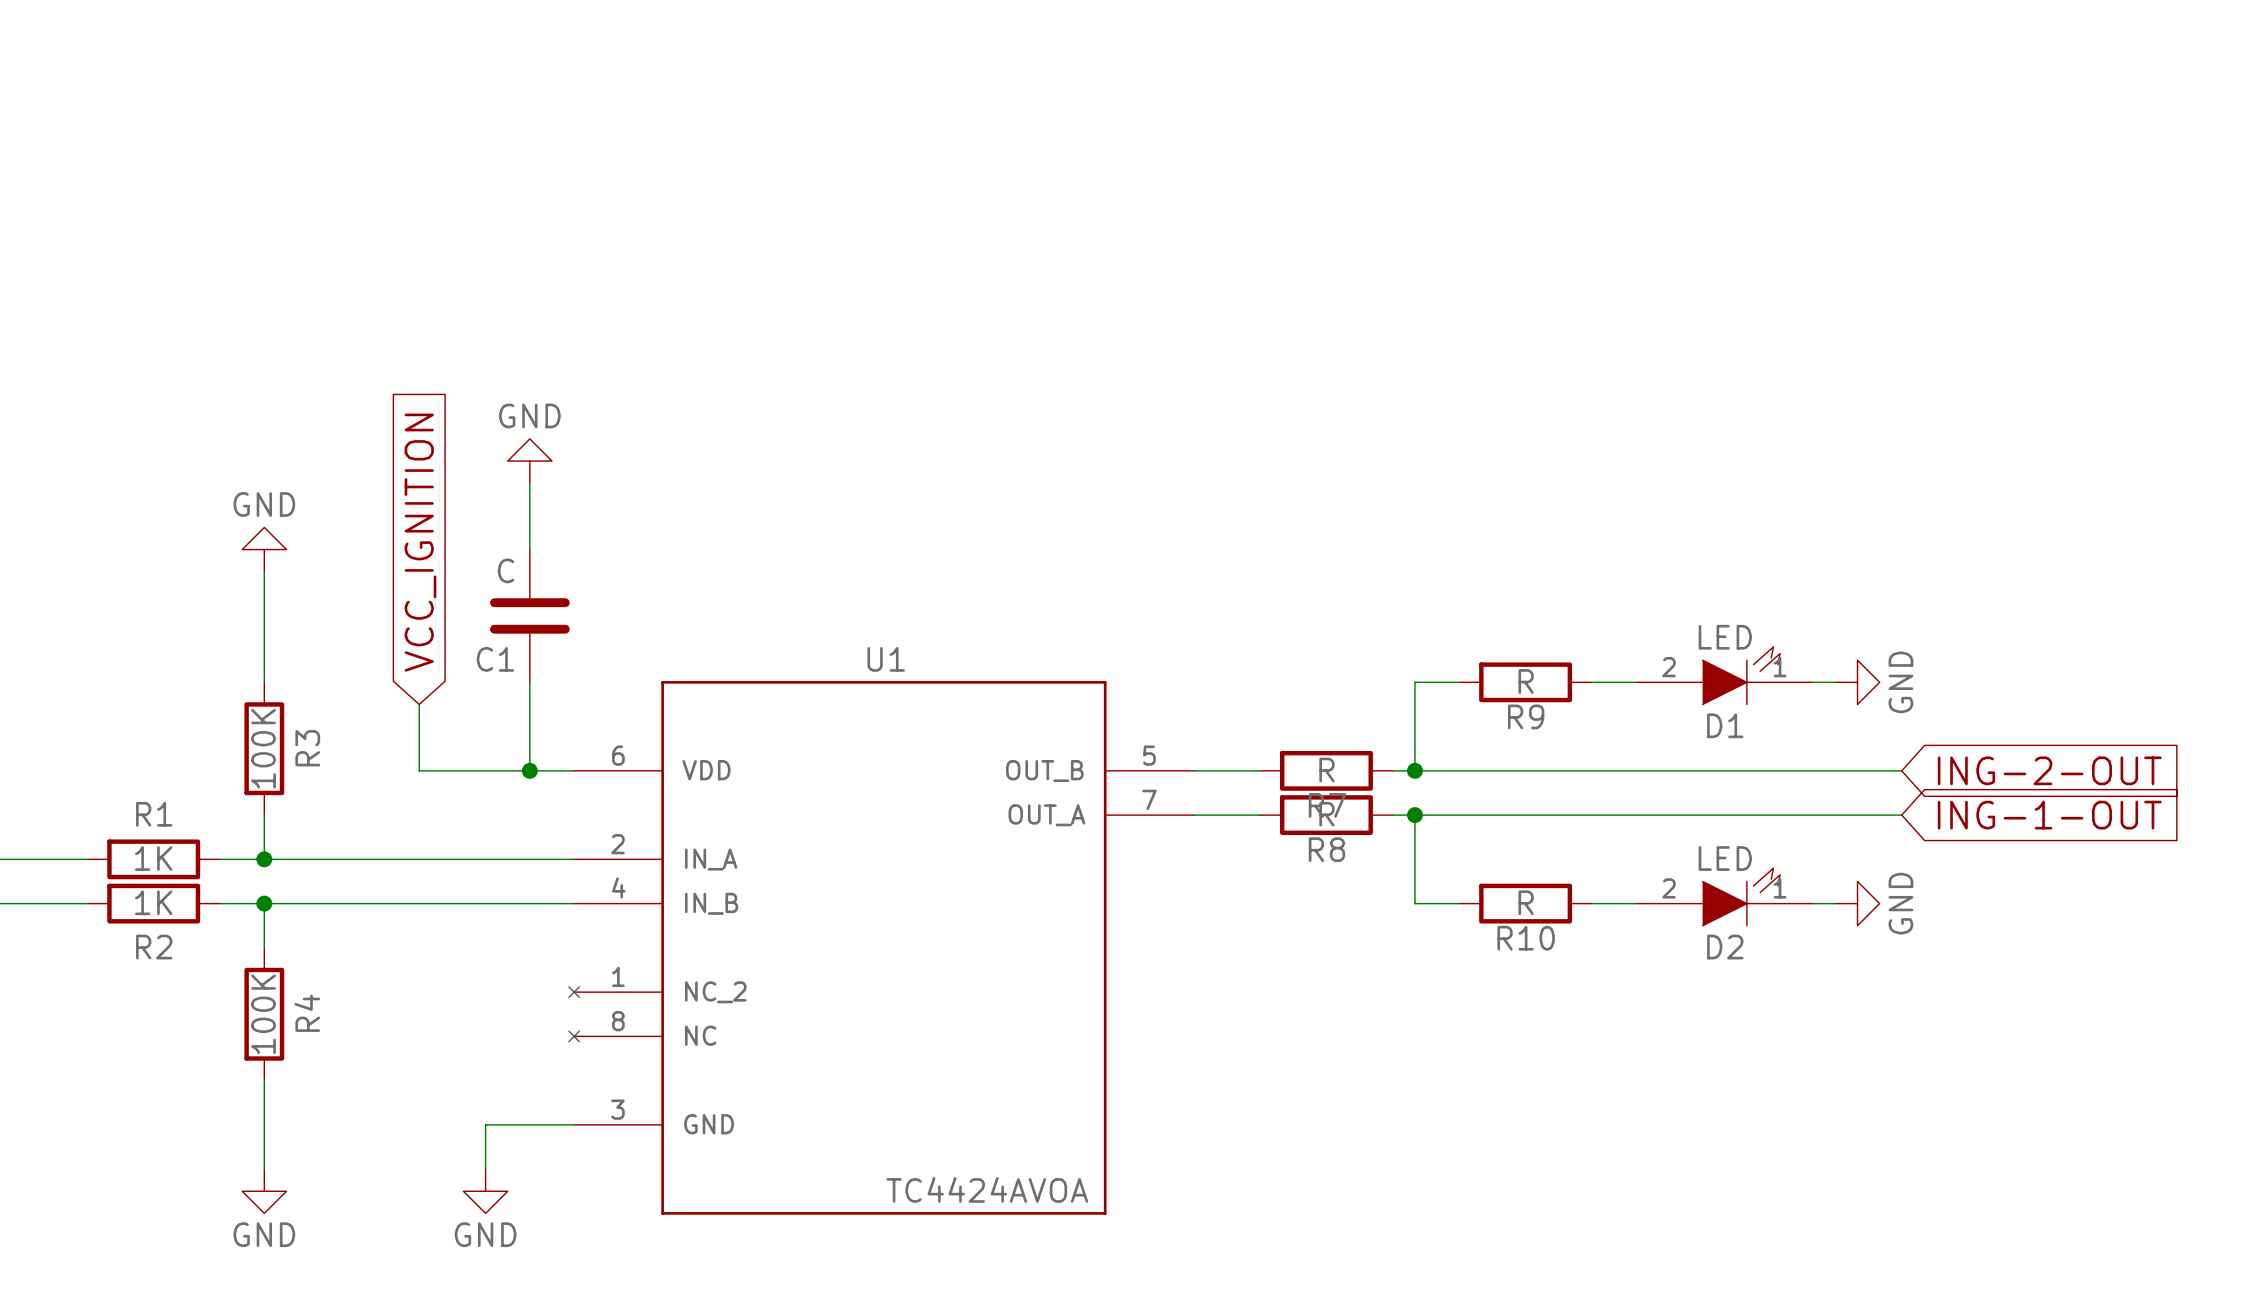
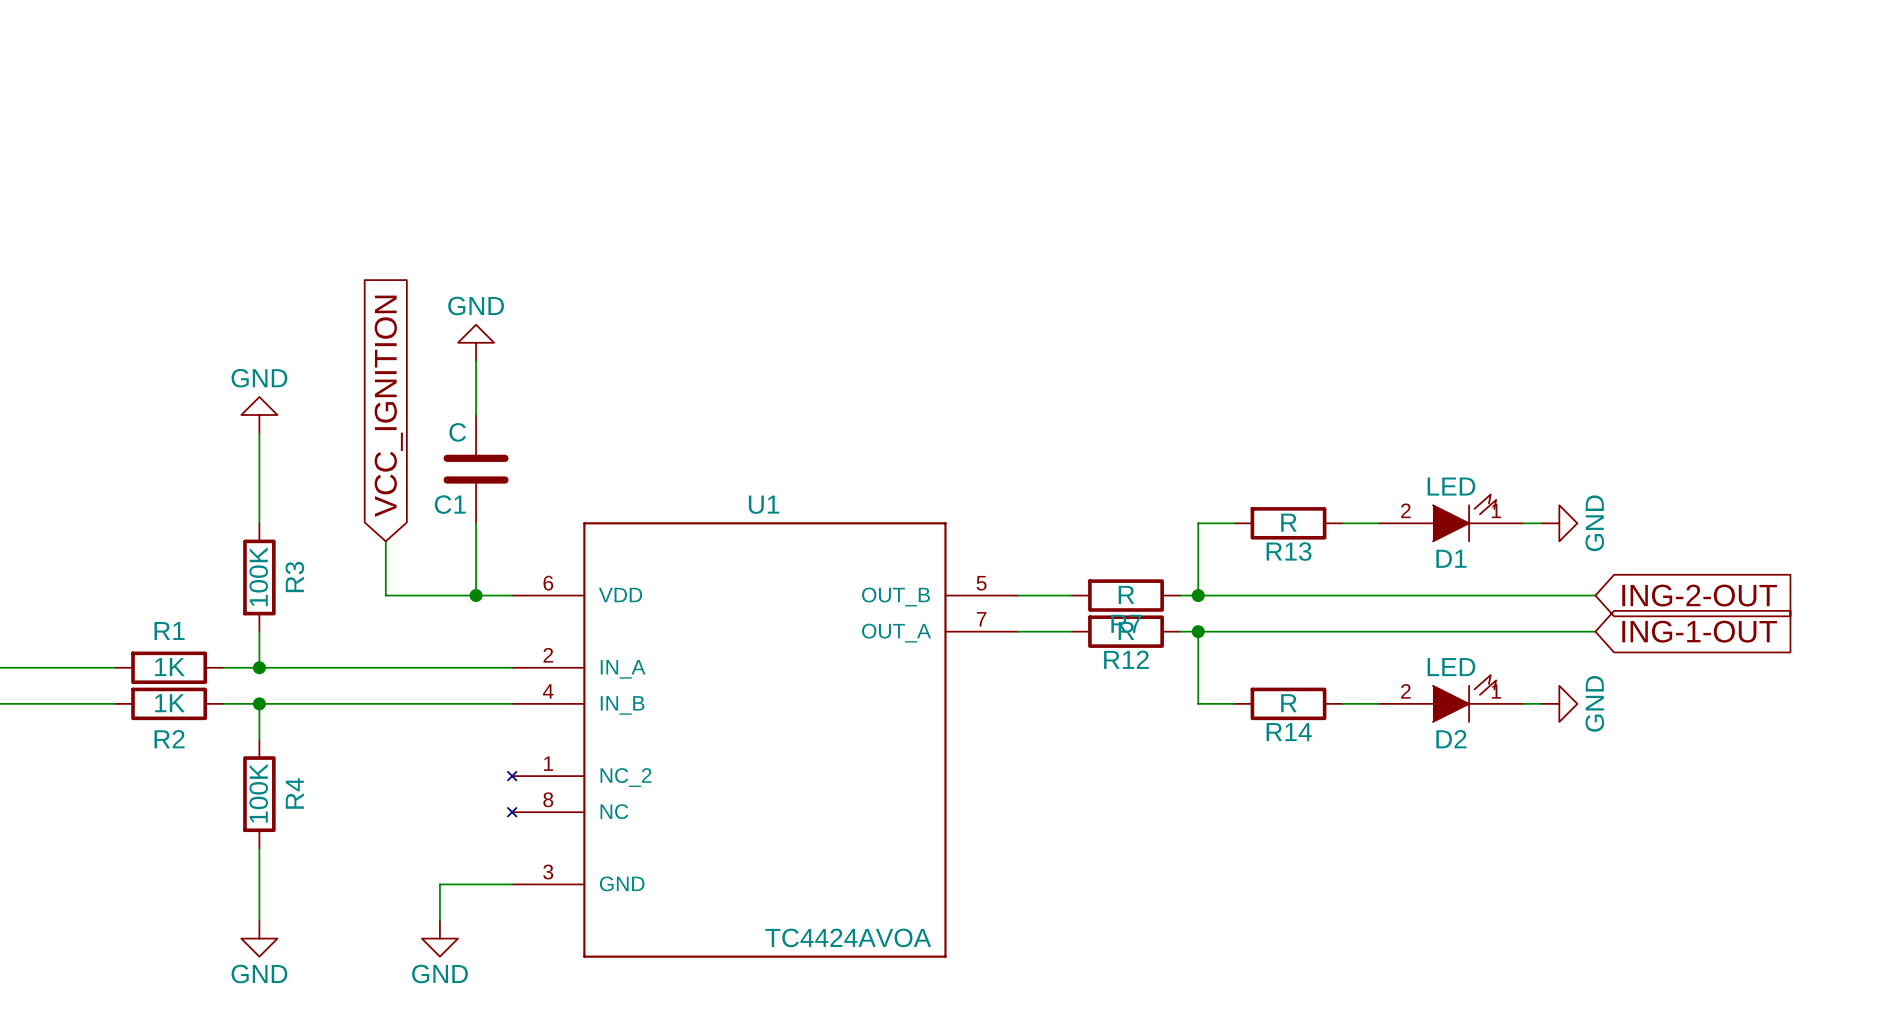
R9 name: R9 (1526, 716) -> R13 (1289, 551)
R8 name: R8 (1326, 849) -> R12 (1126, 659)
R10 name: R10 (1526, 938) -> R14 (1289, 732)

